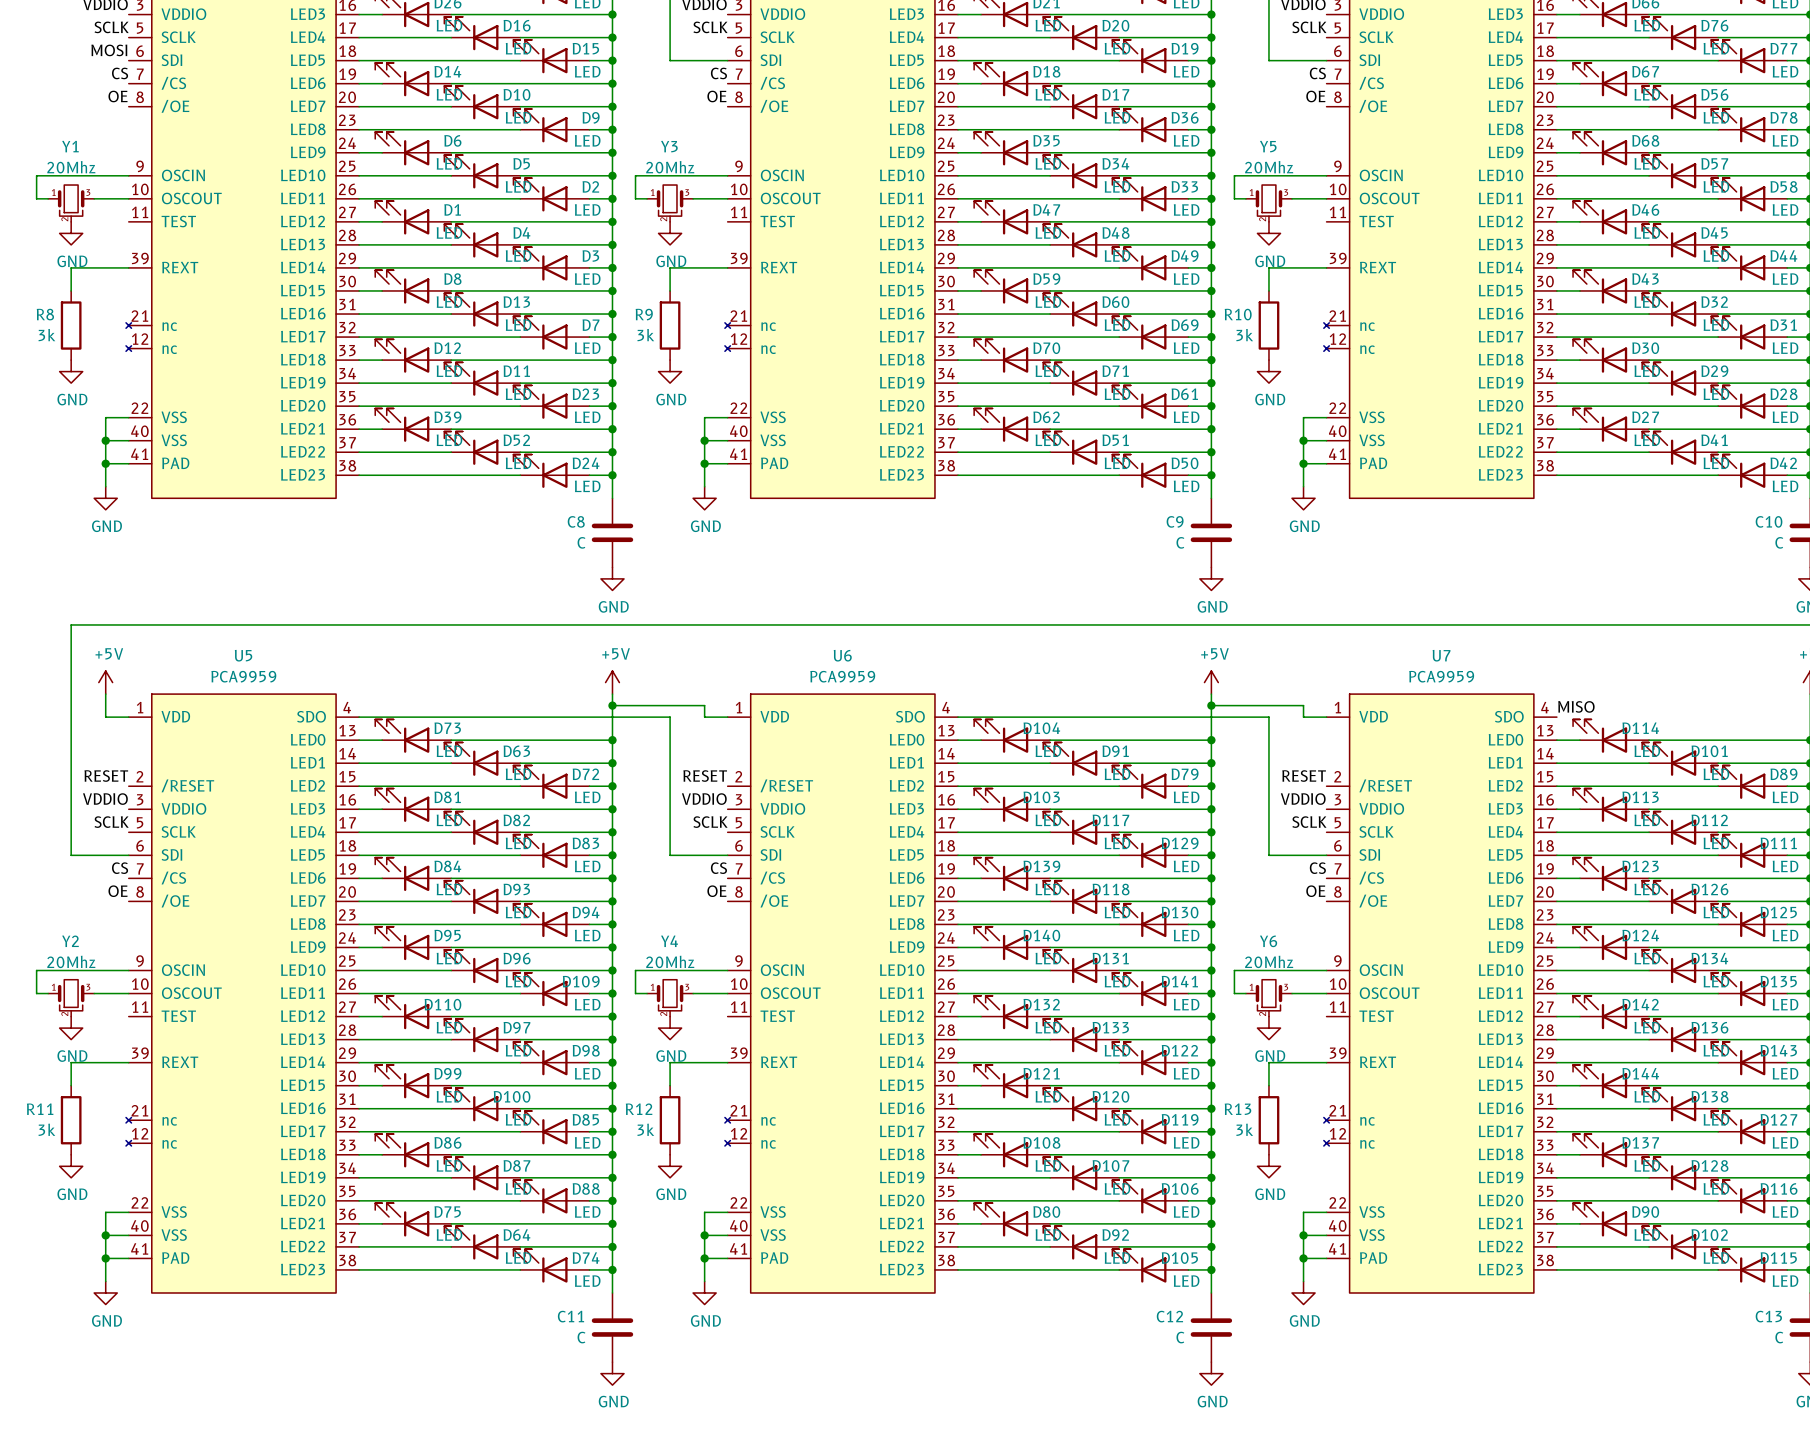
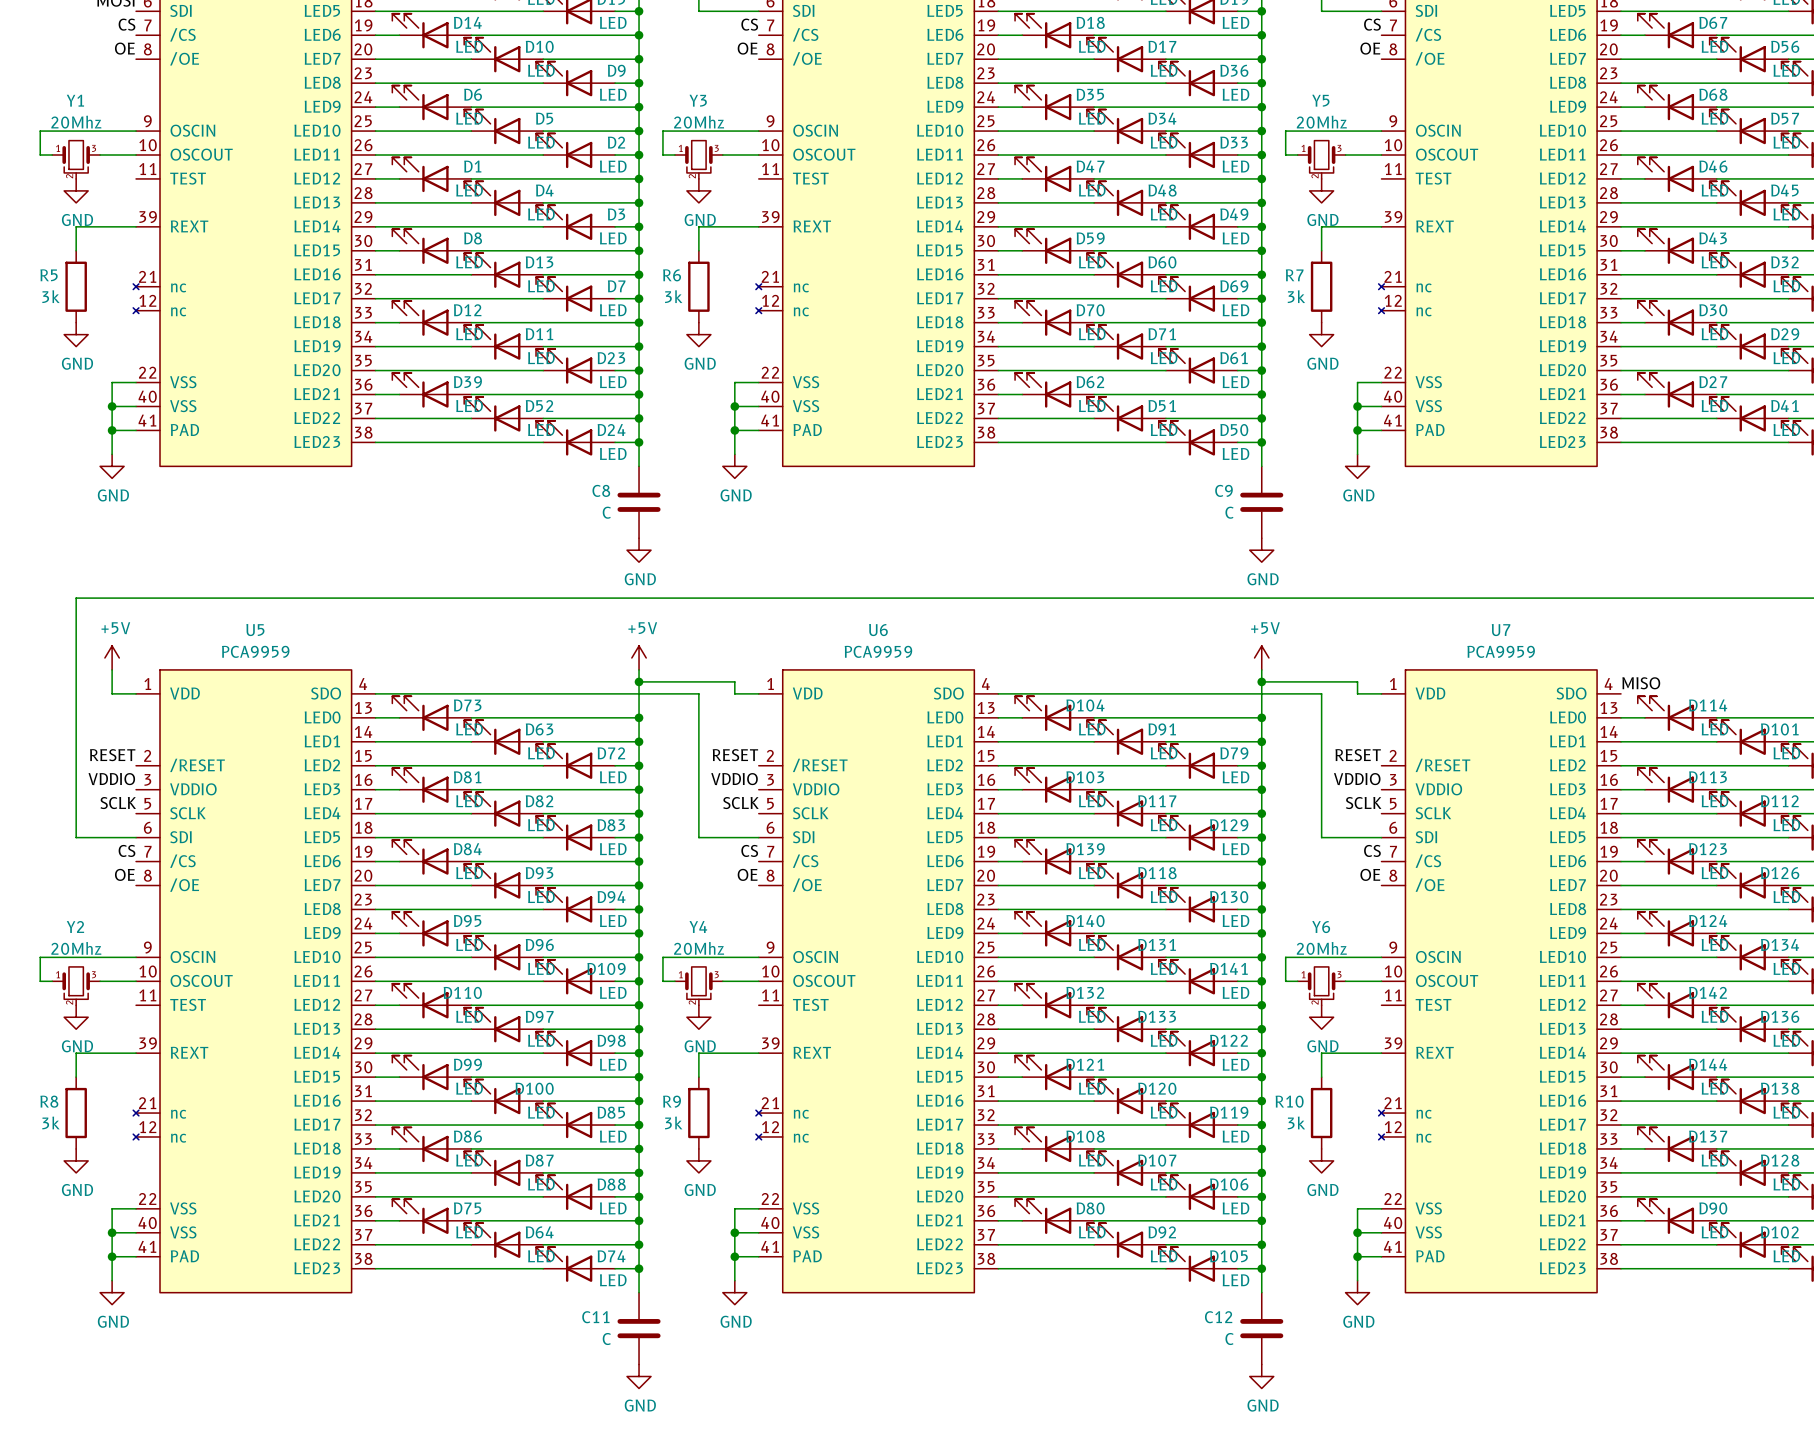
R8 name: R8 (45, 314) -> R5 (49, 275)
R9 name: R9 (644, 314) -> R6 (672, 275)
R10 name: R10 (1238, 314) -> R7 (1294, 275)
R11 name: R11 (40, 1109) -> R8 (49, 1101)
R12 name: R12 (639, 1109) -> R9 (672, 1101)
R13 name: R13 (1237, 1109) -> R10 (1289, 1101)

